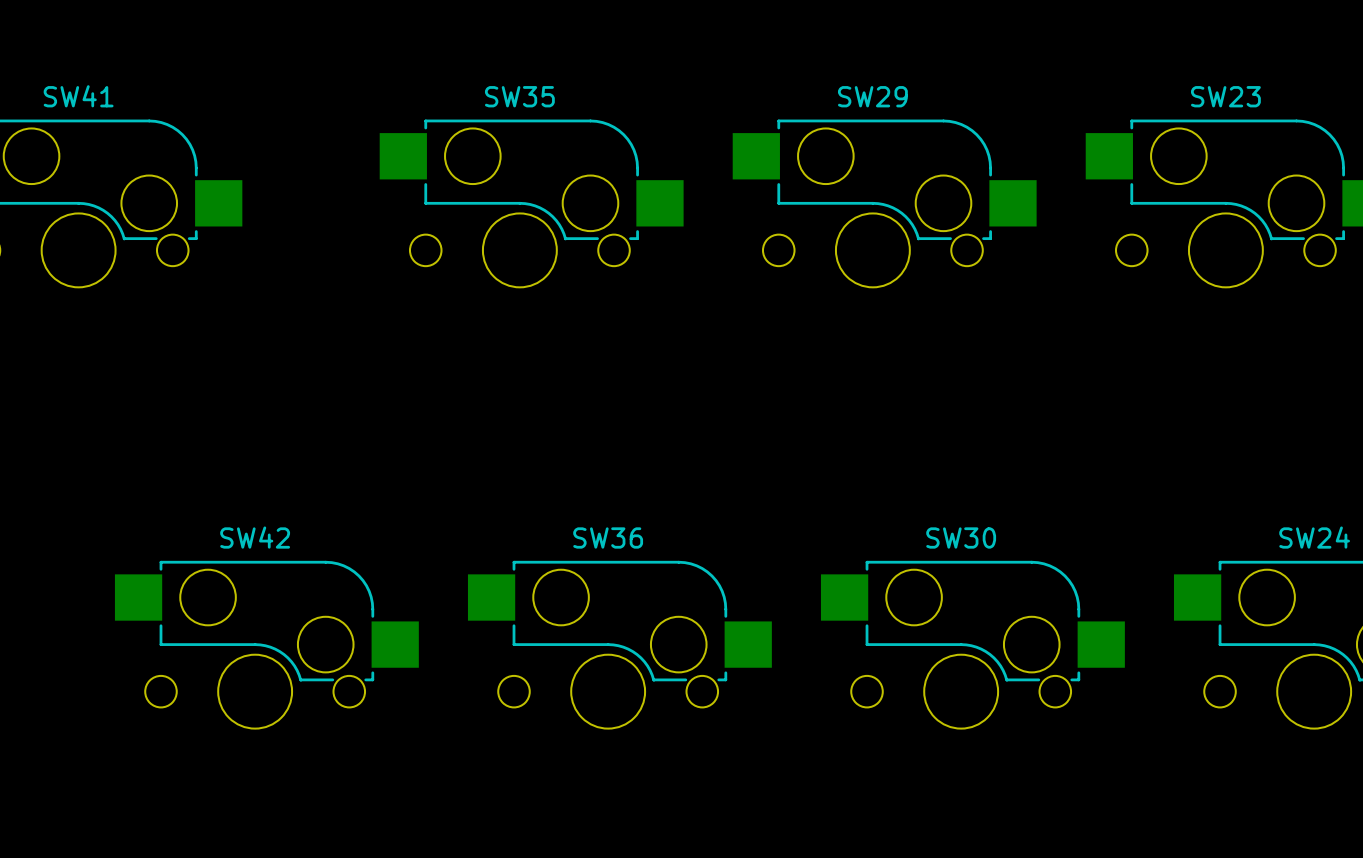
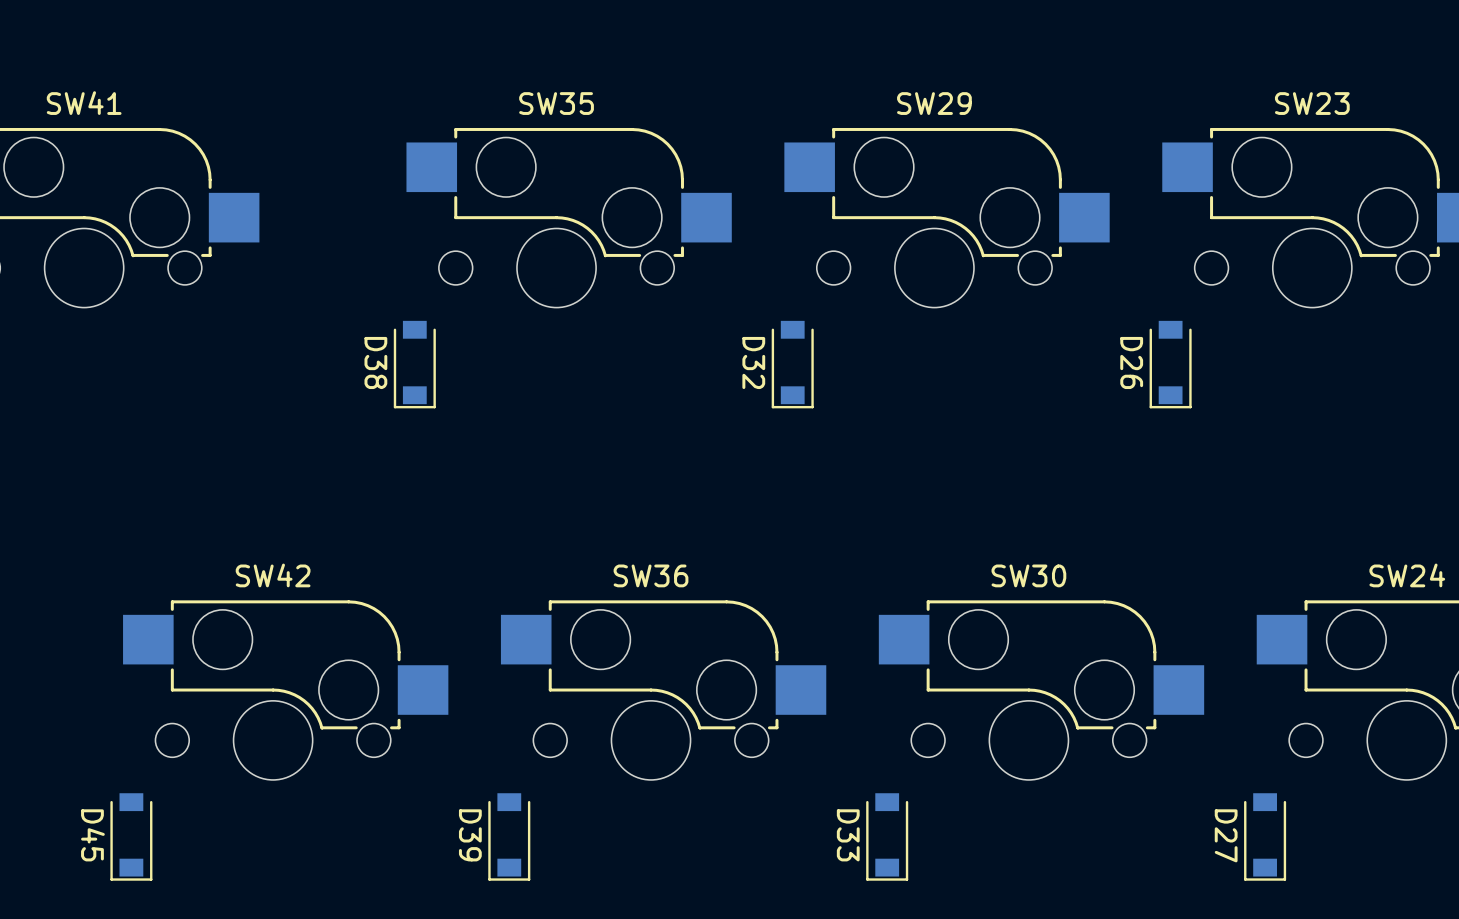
D38: none -> (414, 364)
D32: none -> (792, 364)
D26: none -> (1170, 364)
D45: none -> (131, 836)
D39: none -> (509, 836)
D33: none -> (887, 836)
D27: none -> (1265, 836)

